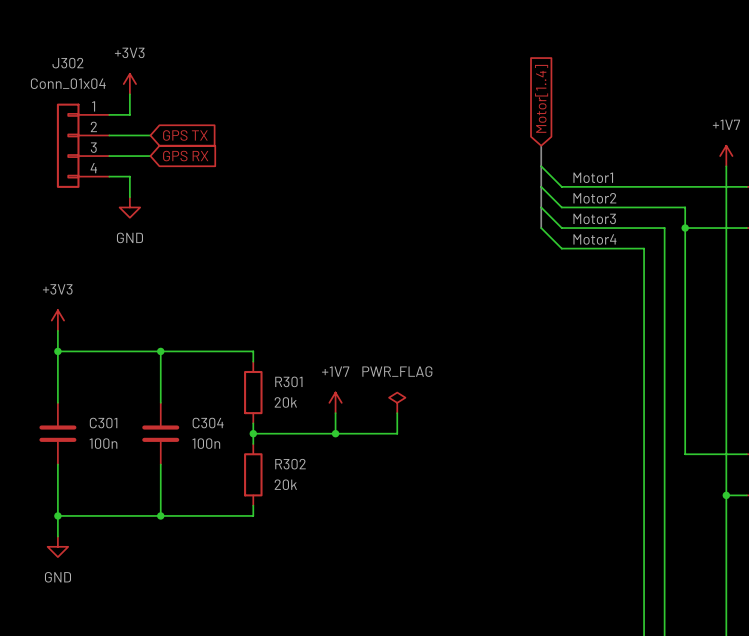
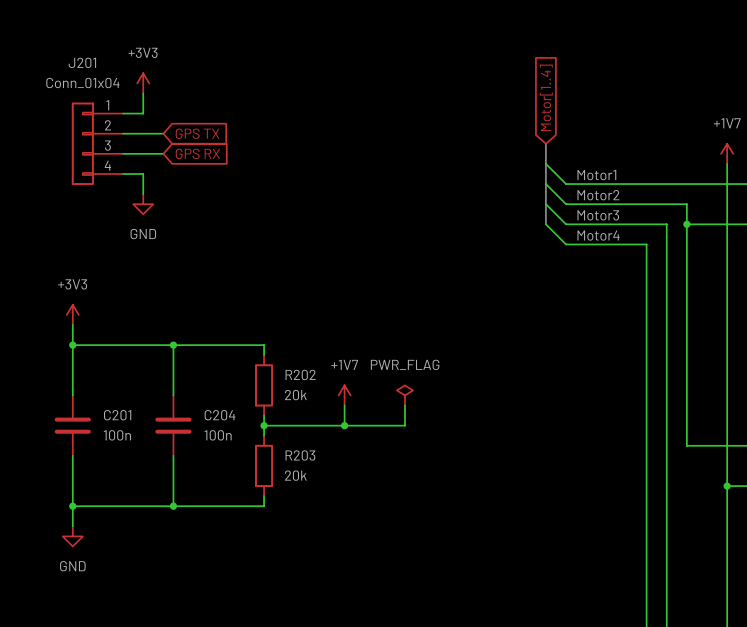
J302 name: J302 (67, 63) -> J201 (82, 62)
R301 name: R301 (288, 381) -> R202 (300, 374)
C301 name: C301 (103, 423) -> C201 (117, 415)
C304 name: C304 (208, 423) -> C204 (219, 415)
R302 name: R302 (290, 464) -> R203 (300, 455)

